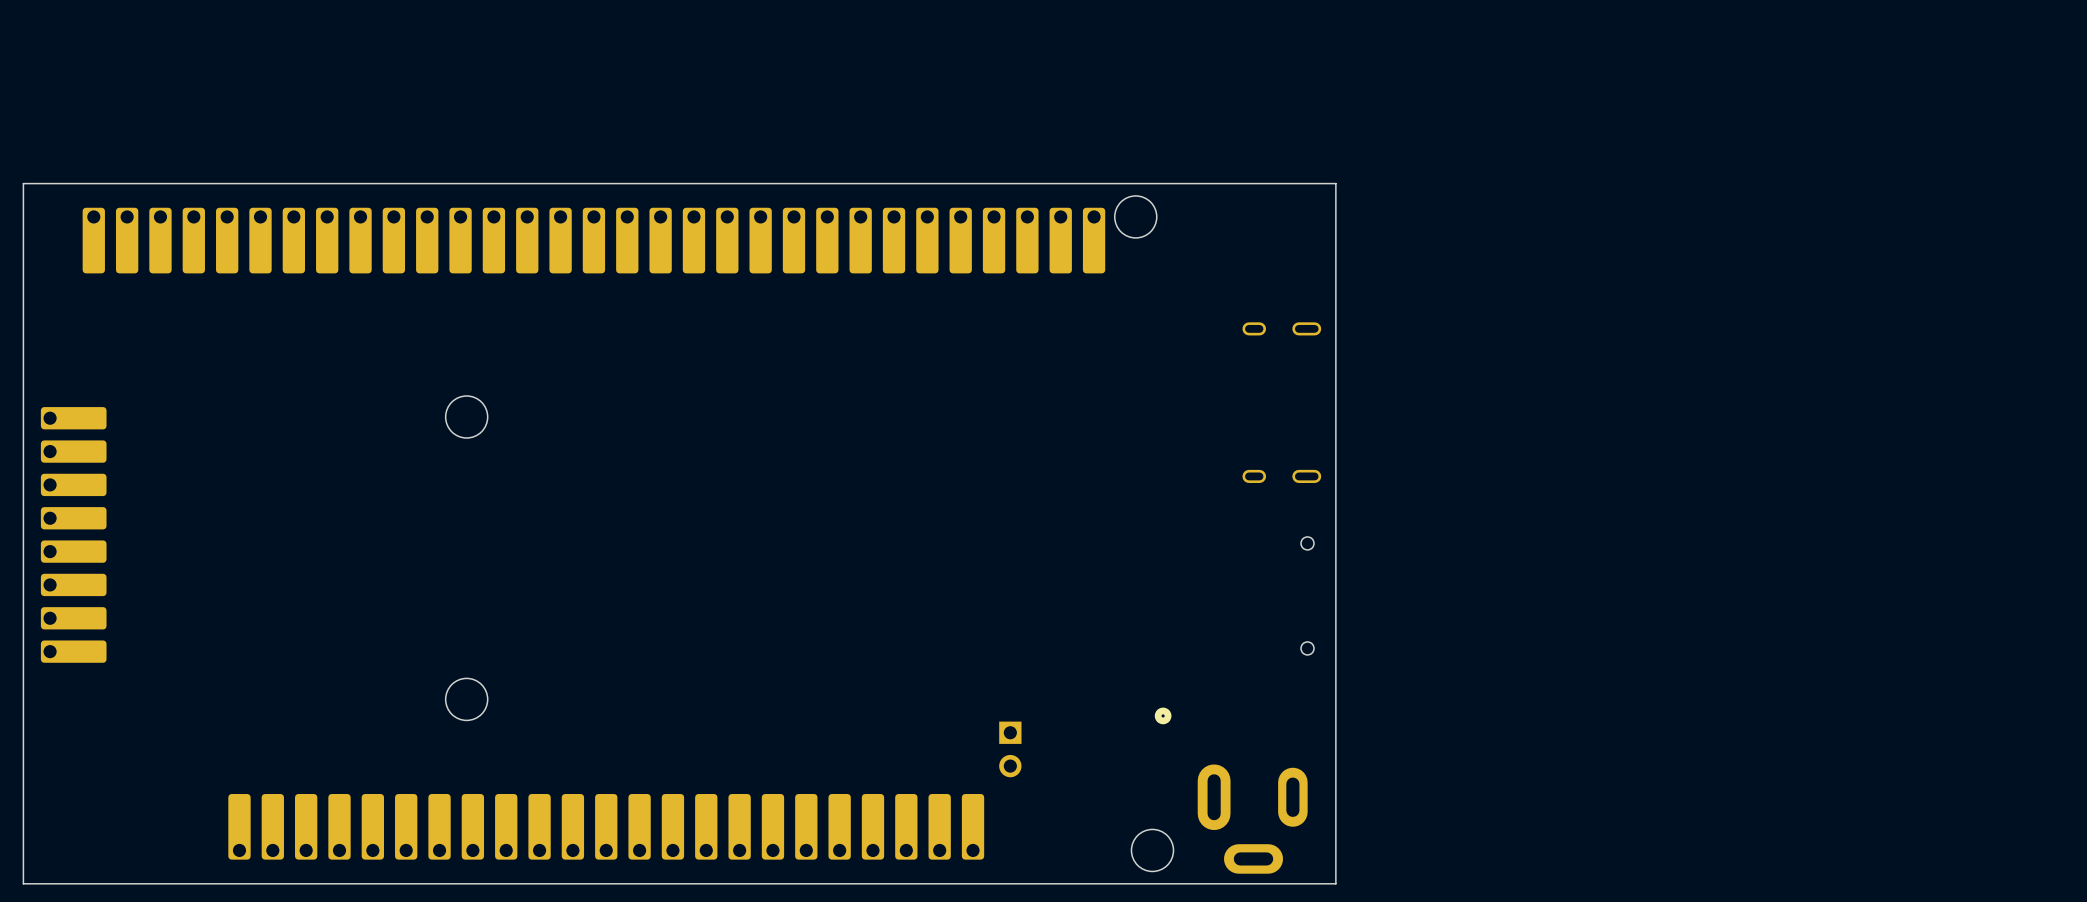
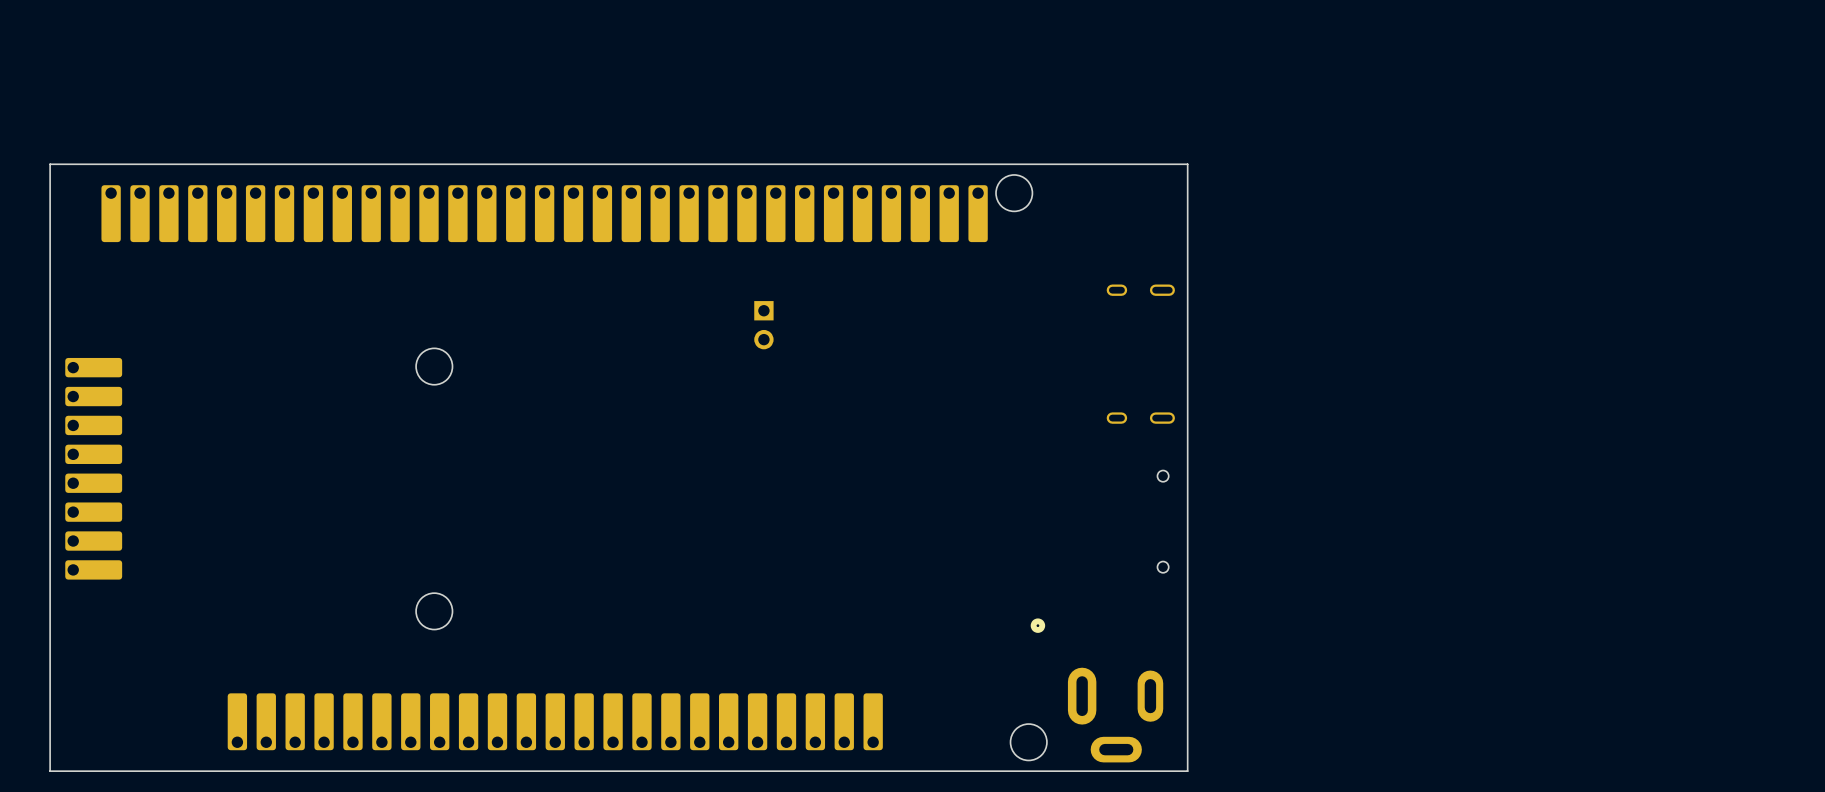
part: none -> (763, 325)
part: (1010, 749) -> none

